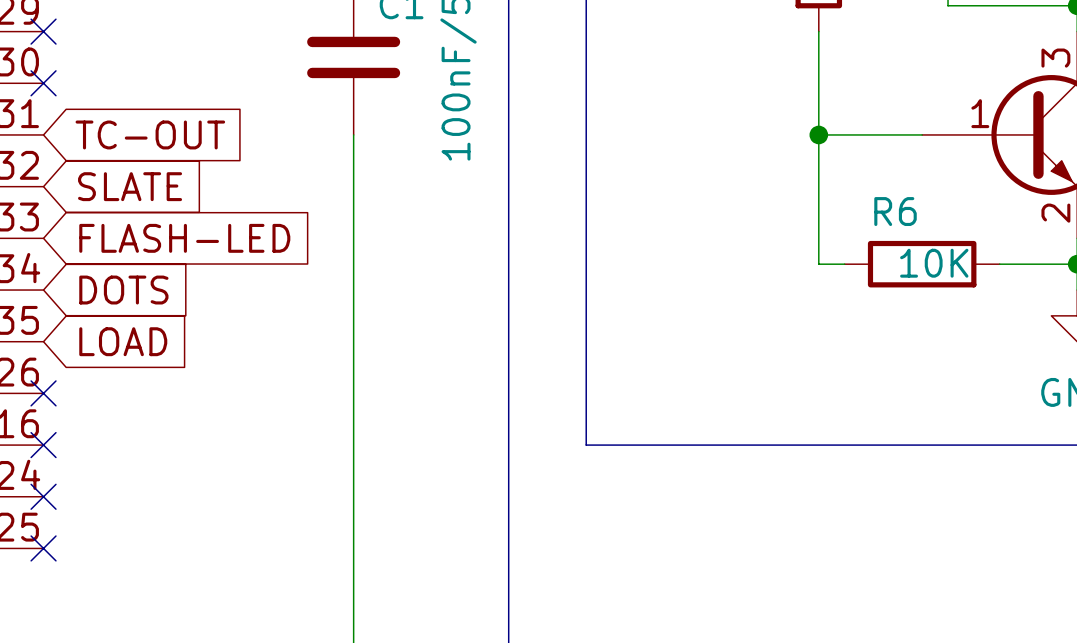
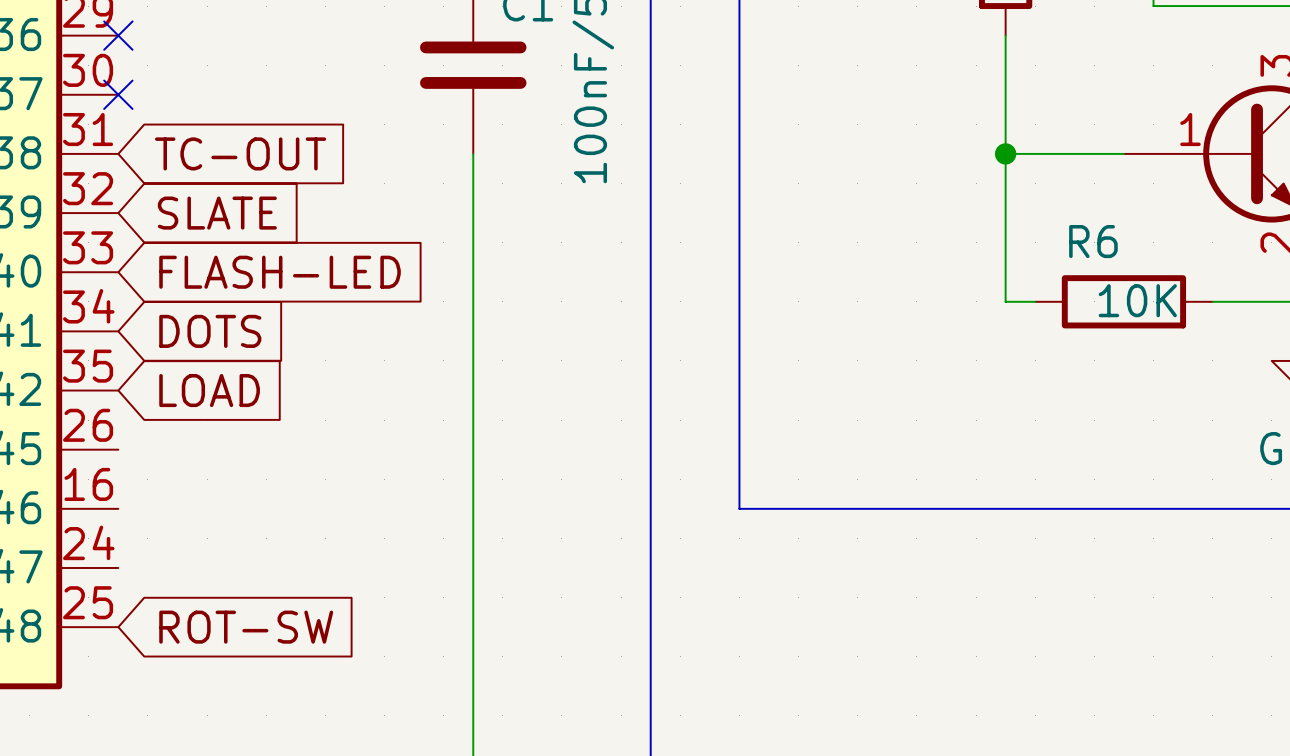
no-connect mark: (43, 393) -> none
no-connect mark: (43, 445) -> none
no-connect mark: (43, 496) -> none
no-connect mark: (43, 548) -> none
global label: none -> ROT-SW (246, 627)

